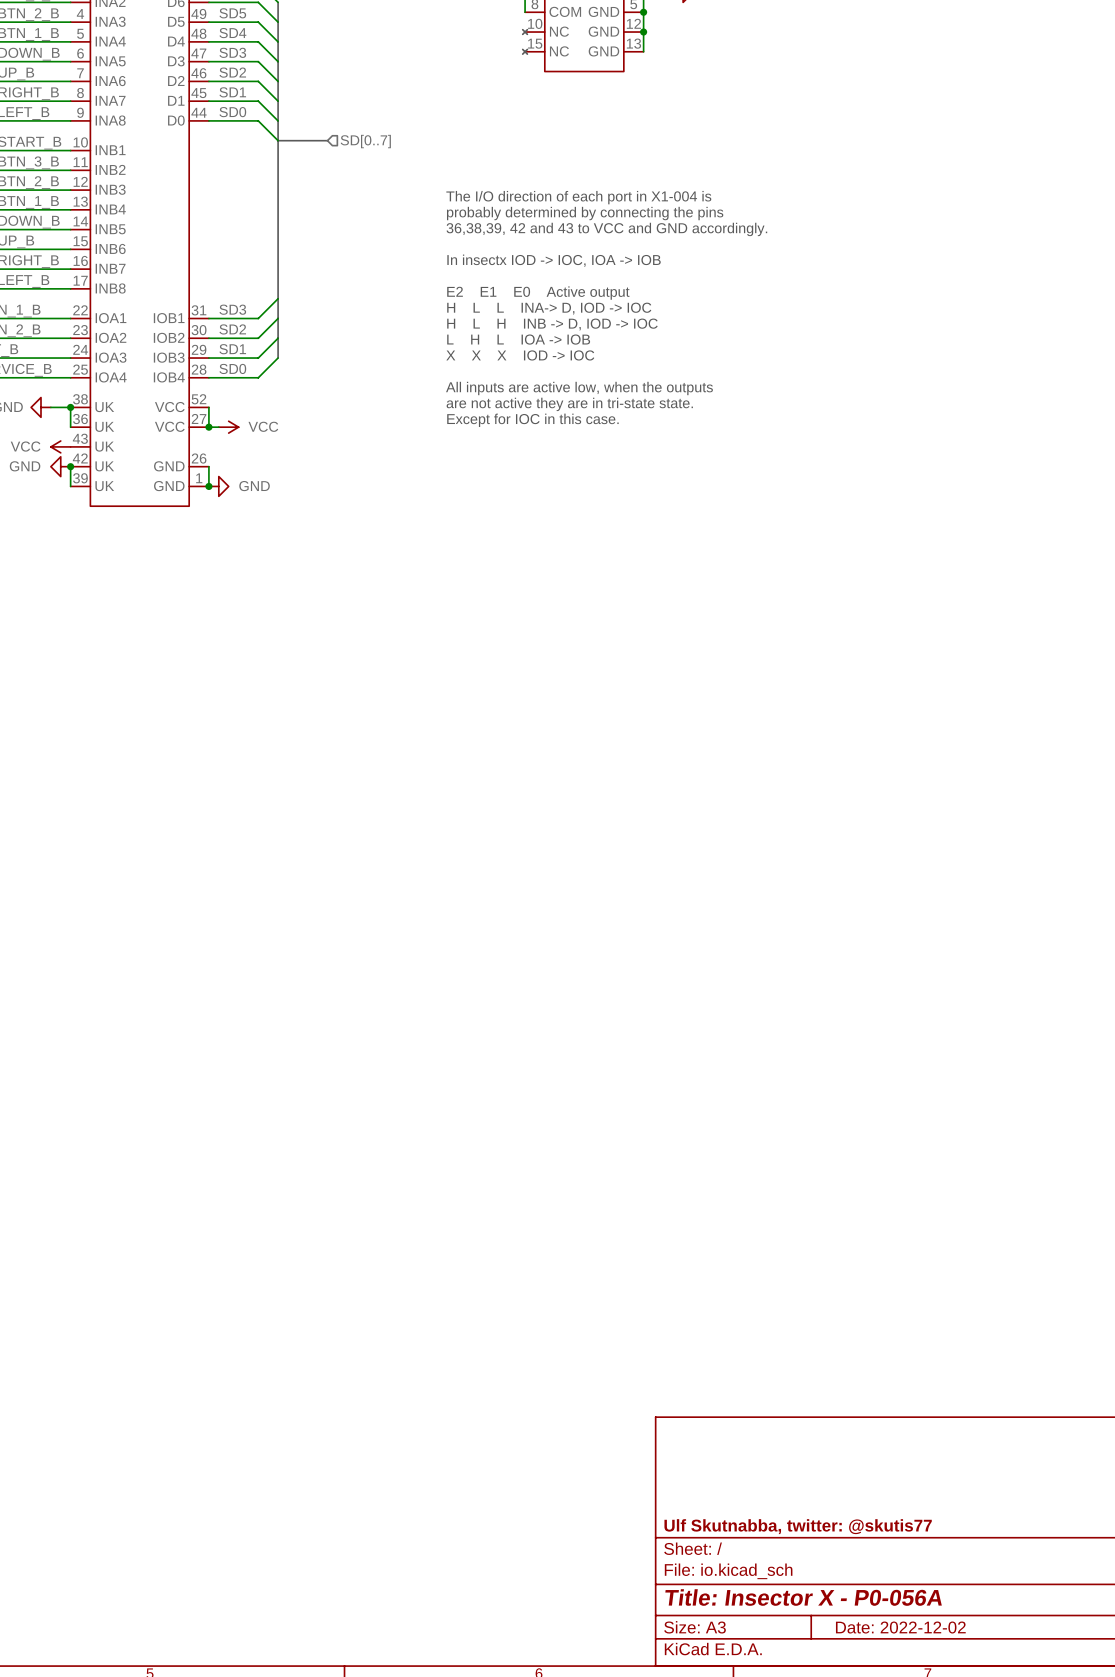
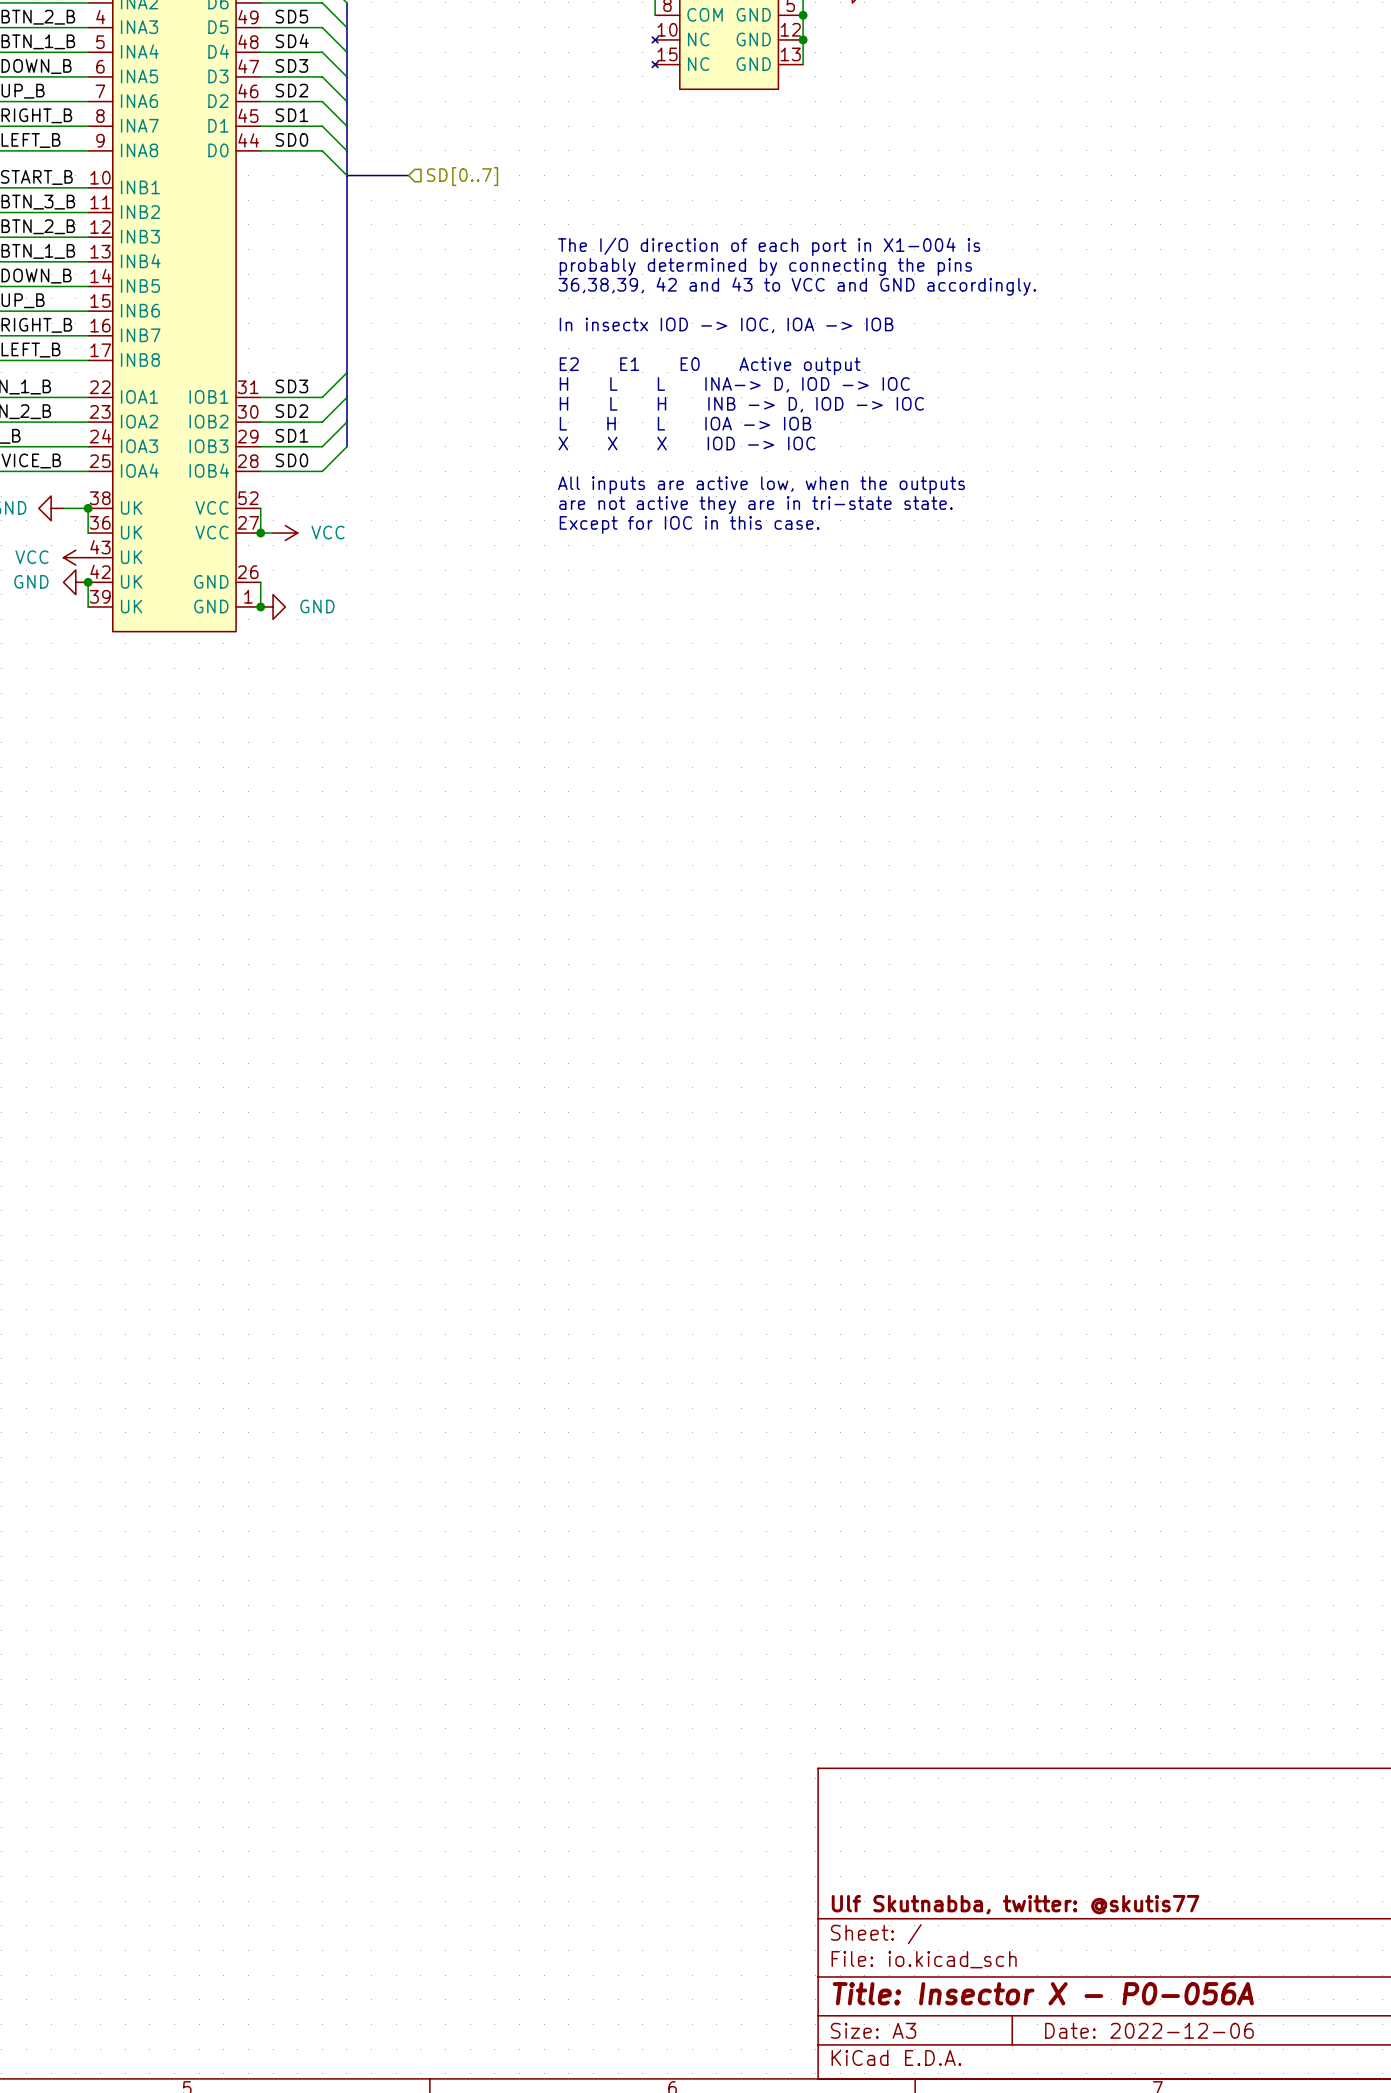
title block: Date: 2022-12-02 (900, 1627) -> Date: 2022-12-06 (1149, 2030)

